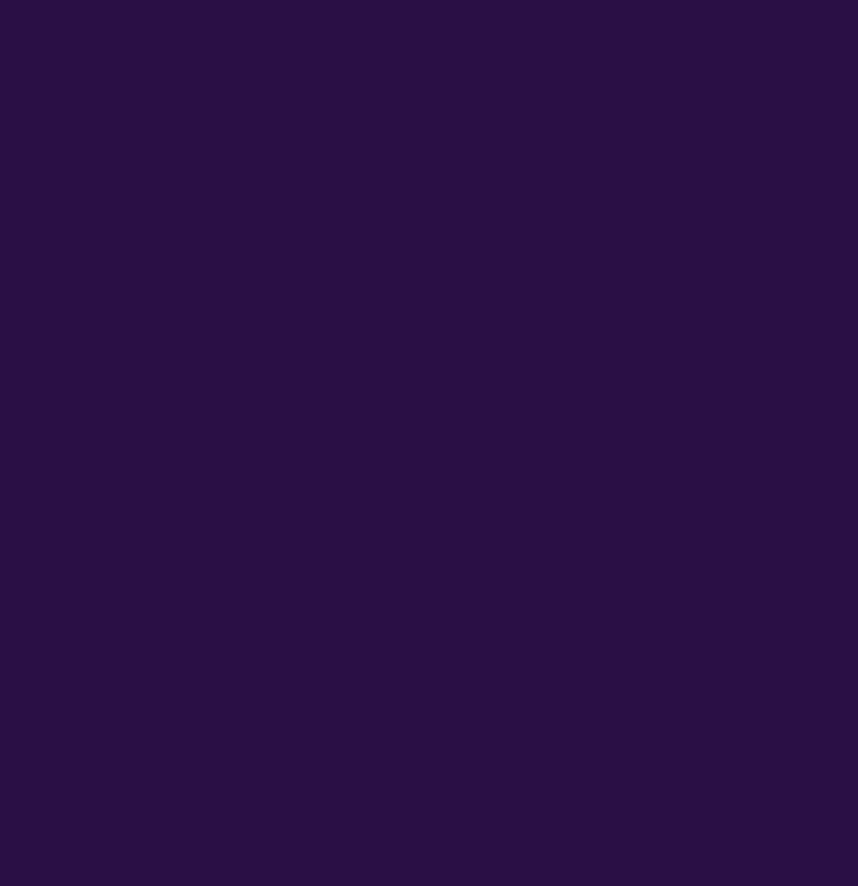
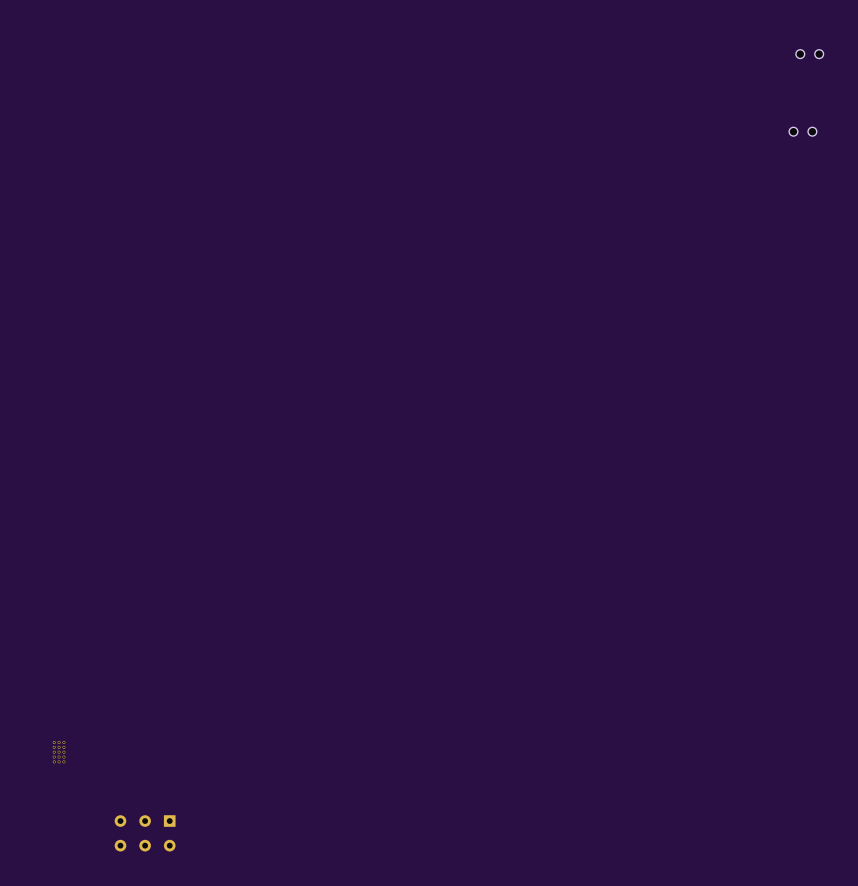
part: none -> (809, 54)
part: none -> (802, 131)
part: none -> (59, 752)
part: none -> (145, 833)

